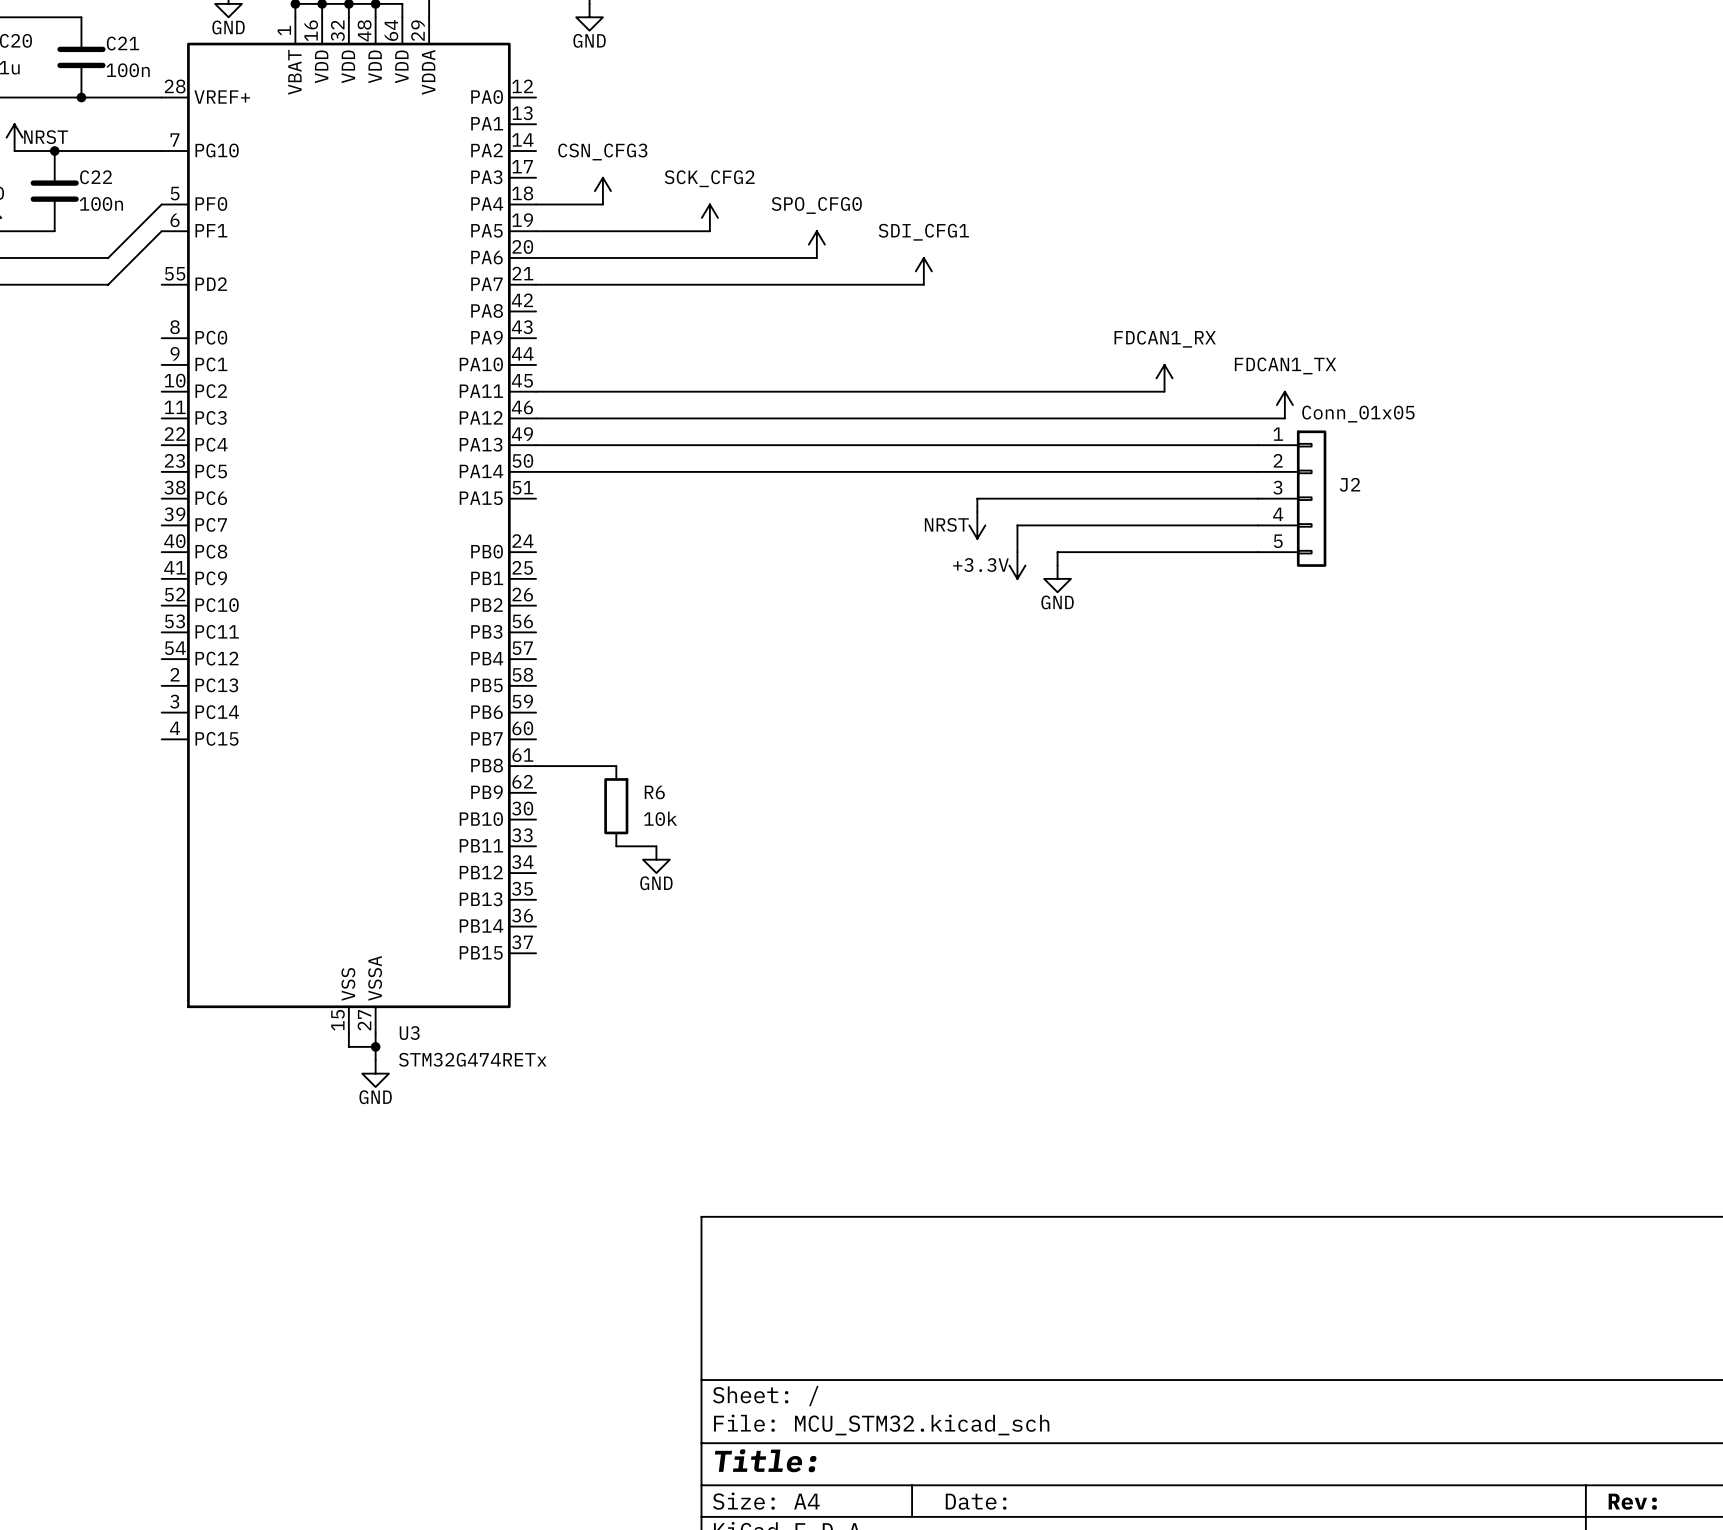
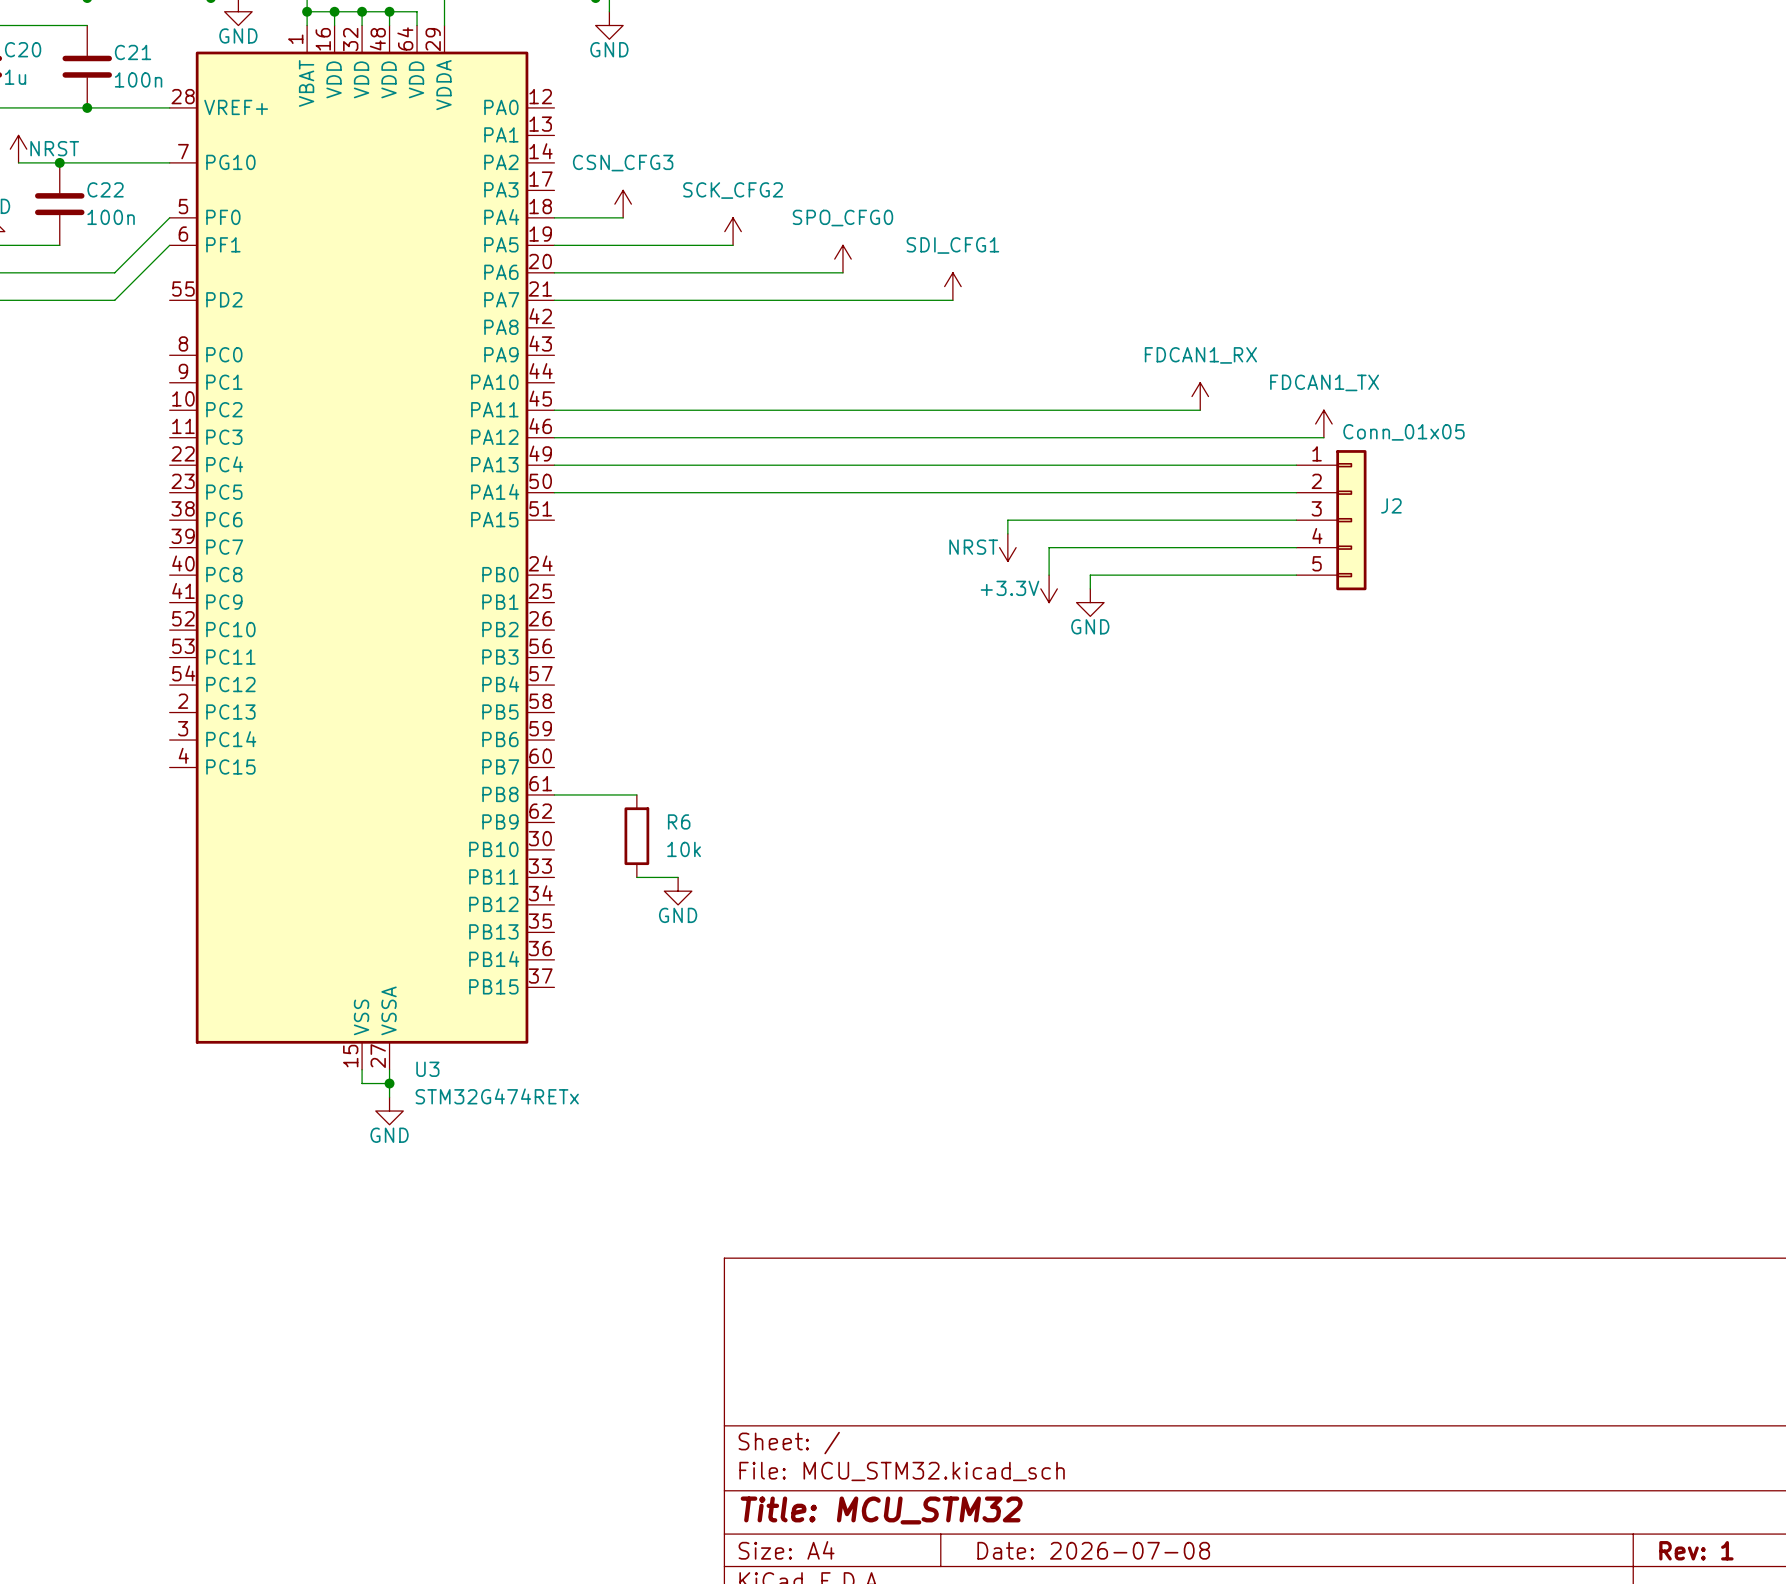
title block: Title: (765, 1460) -> Title: MCU_STM32 (881, 1510)
title block: Date: (976, 1501) -> Date: 2026-07-08 (1093, 1550)
title block: Rev: (1632, 1501) -> Rev: 1 (1696, 1550)

